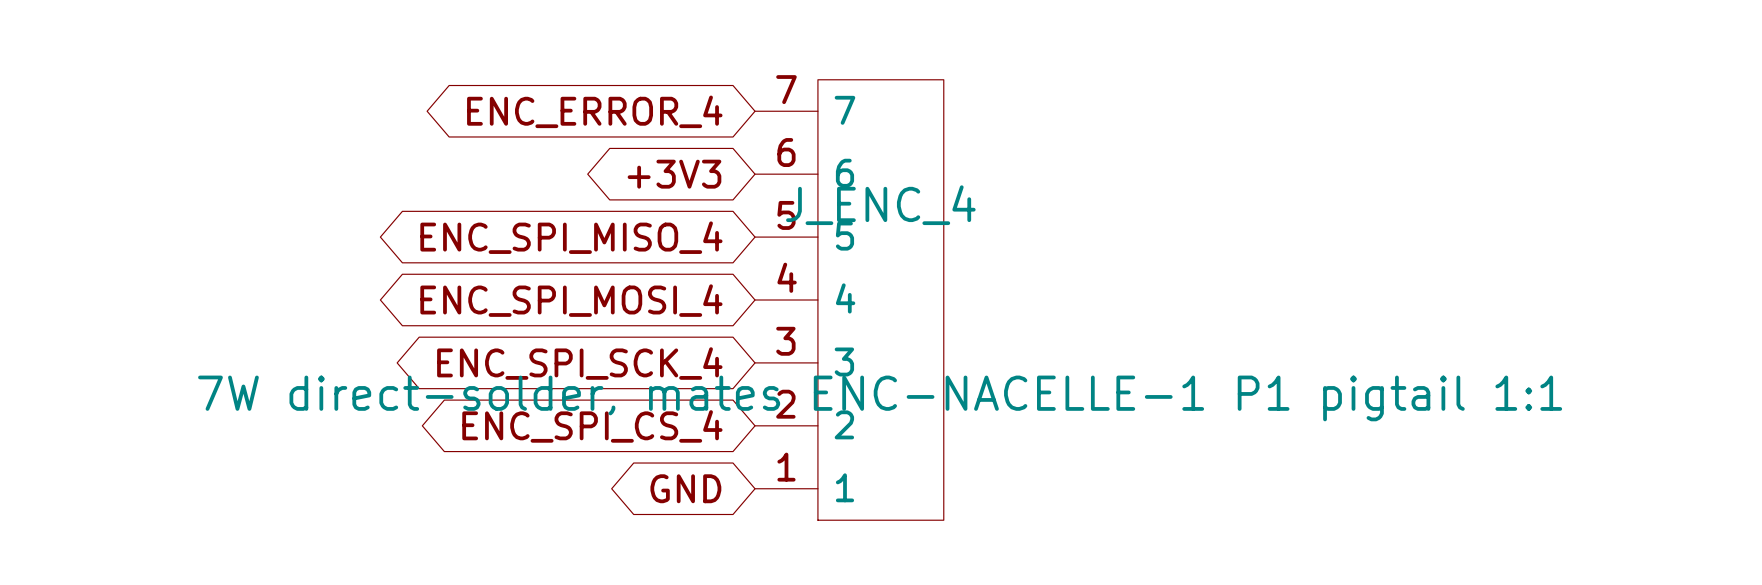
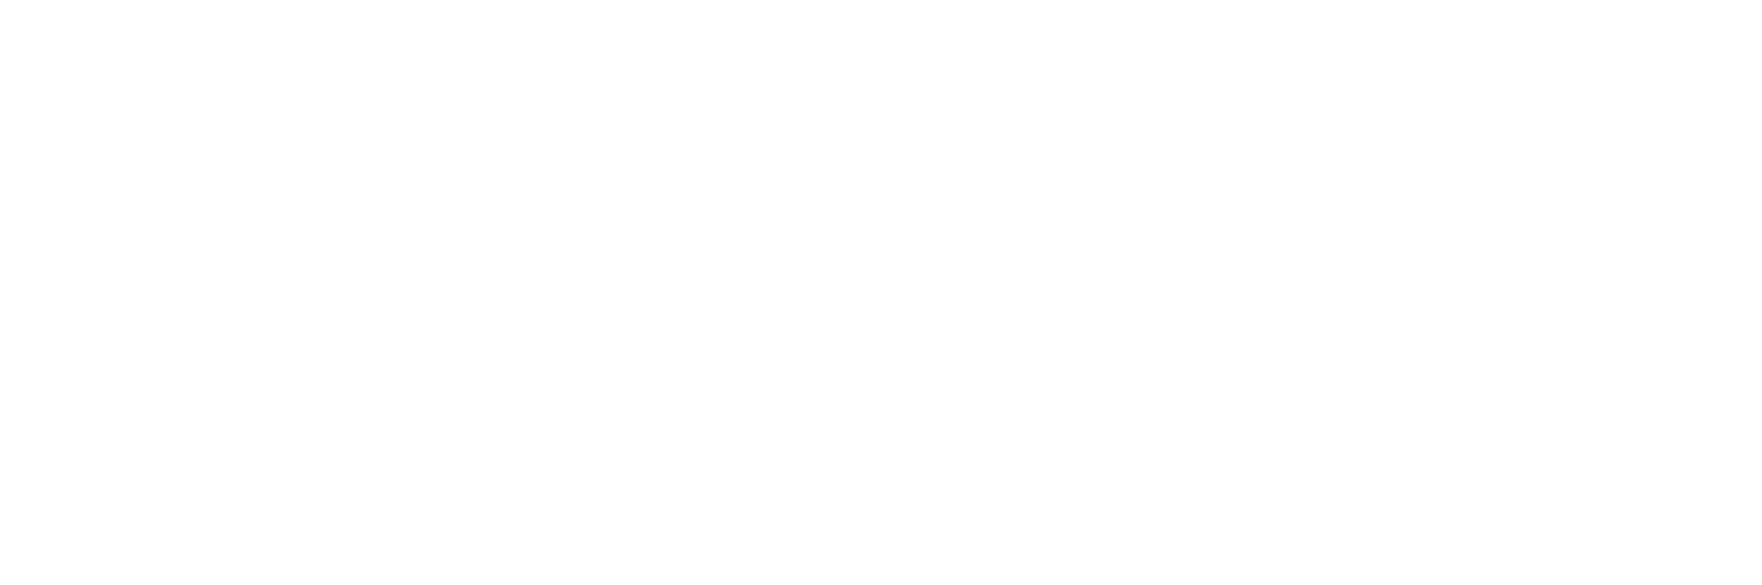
global label: ENC_ERROR_4 (594, 111) -> none
global label: +3V3 (674, 174) -> none
global label: ENC_SPI_MISO_4 (571, 237) -> none
global label: ENC_SPI_MOSI_4 (571, 300) -> none
J_ENC_4: 7W direct-solder, mates ENC-NACELLE-1 P1 pigtail 1:1 (849, 300) -> none
global label: ENC_SPI_SCK_4 (579, 363) -> none
global label: ENC_SPI_CS_4 (592, 426) -> none
global label: GND (685, 488) -> none

